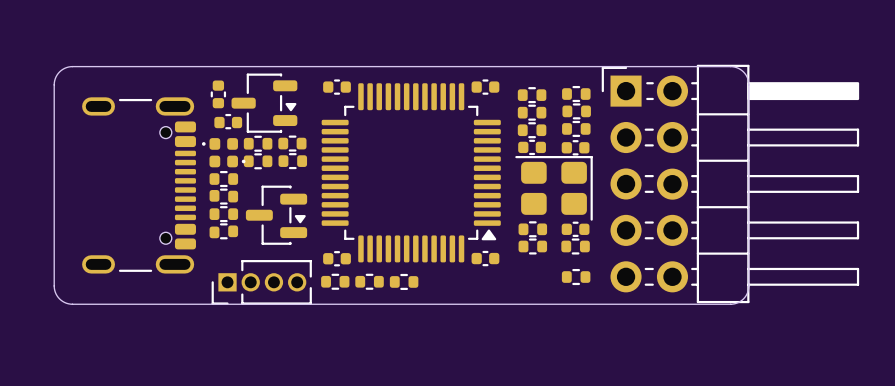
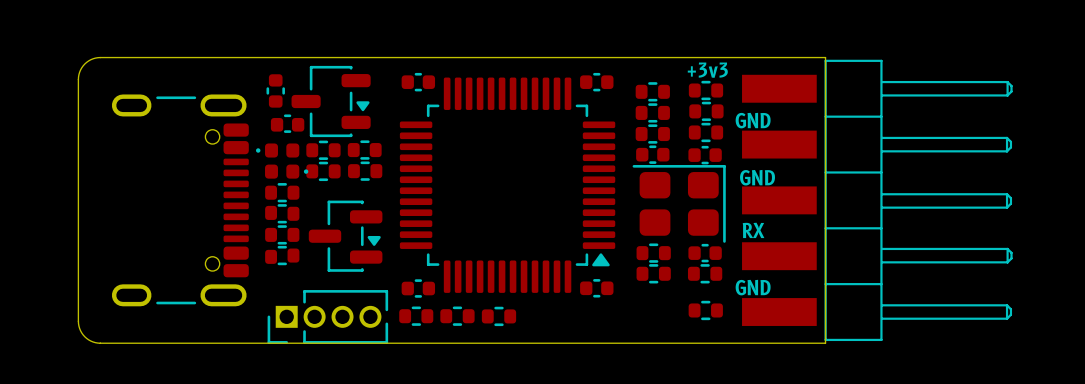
part footprint: [601, 64, 860, 304] -> [742, 59, 1013, 342]
board edge: (675, 66) (734, 67) (744, 73) (748, 84) (747, 292) (742, 300) (732, 304) (675, 304) -> (825, 57) (825, 343)
text: none -> +3v3 (707, 70)
text: none -> GND (753, 120)
text: none -> GND (757, 177)
text: none -> RX (753, 230)
text: none -> GND (753, 287)

